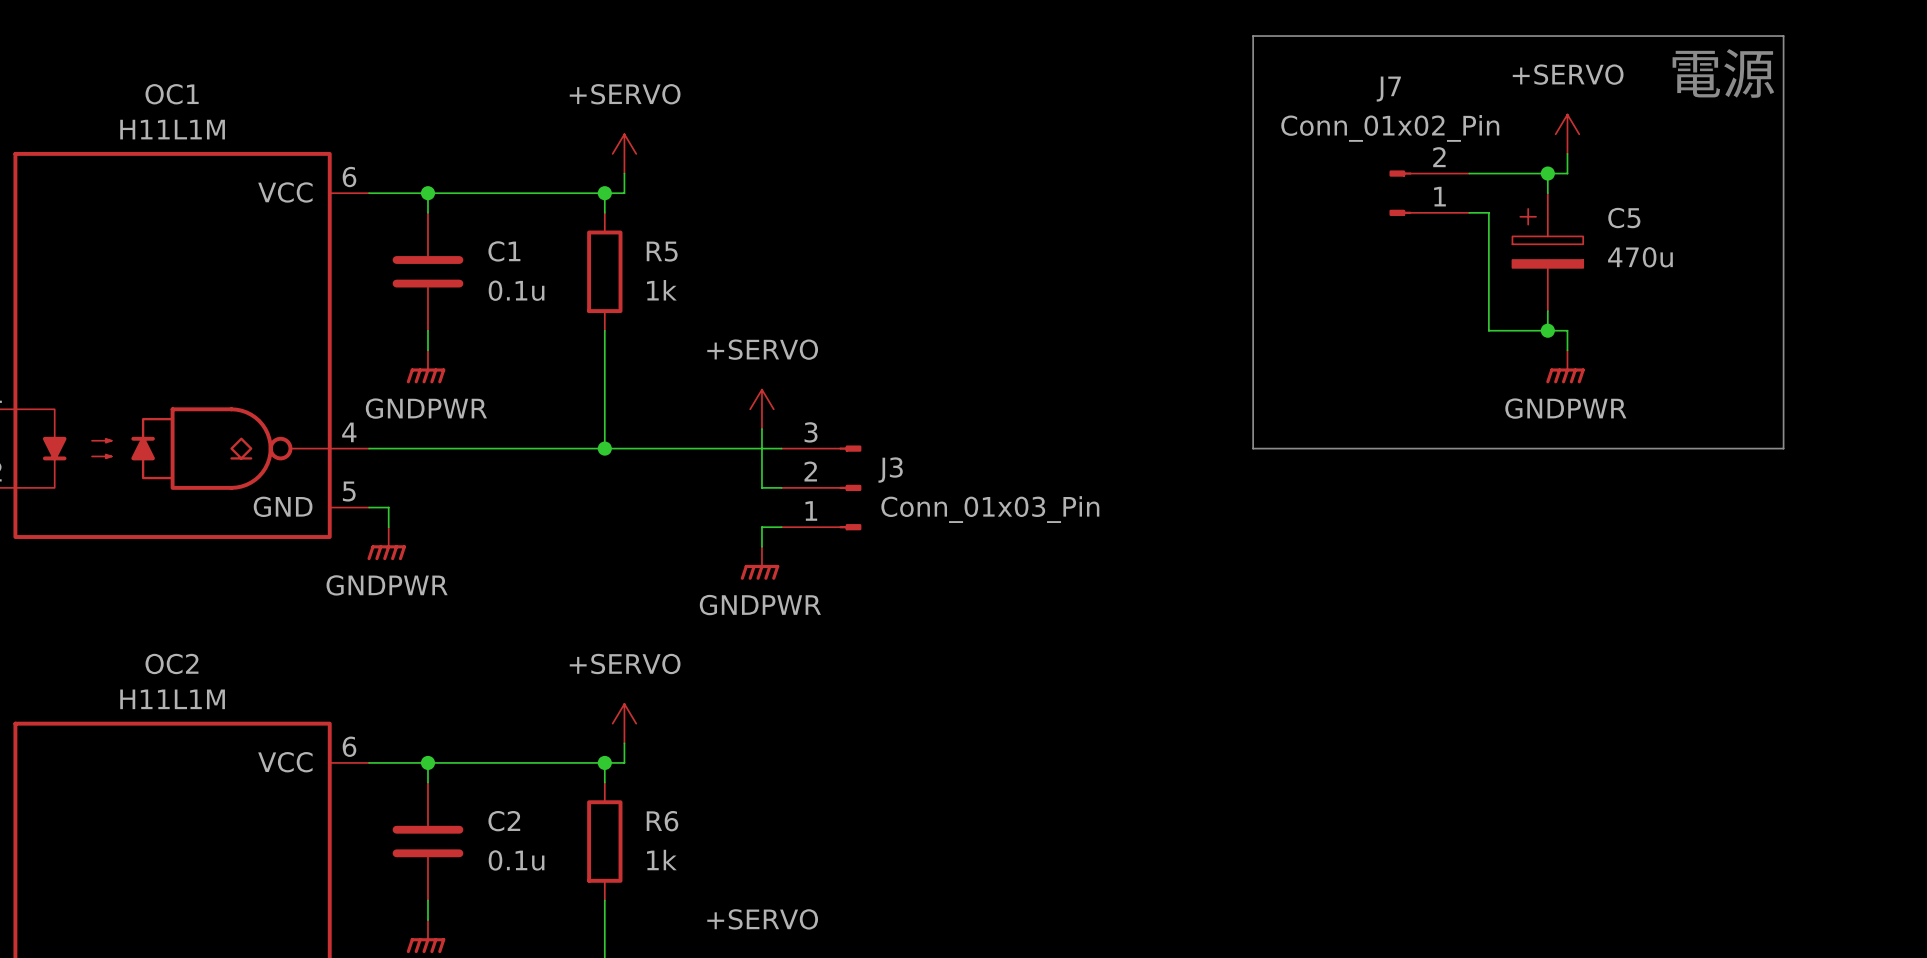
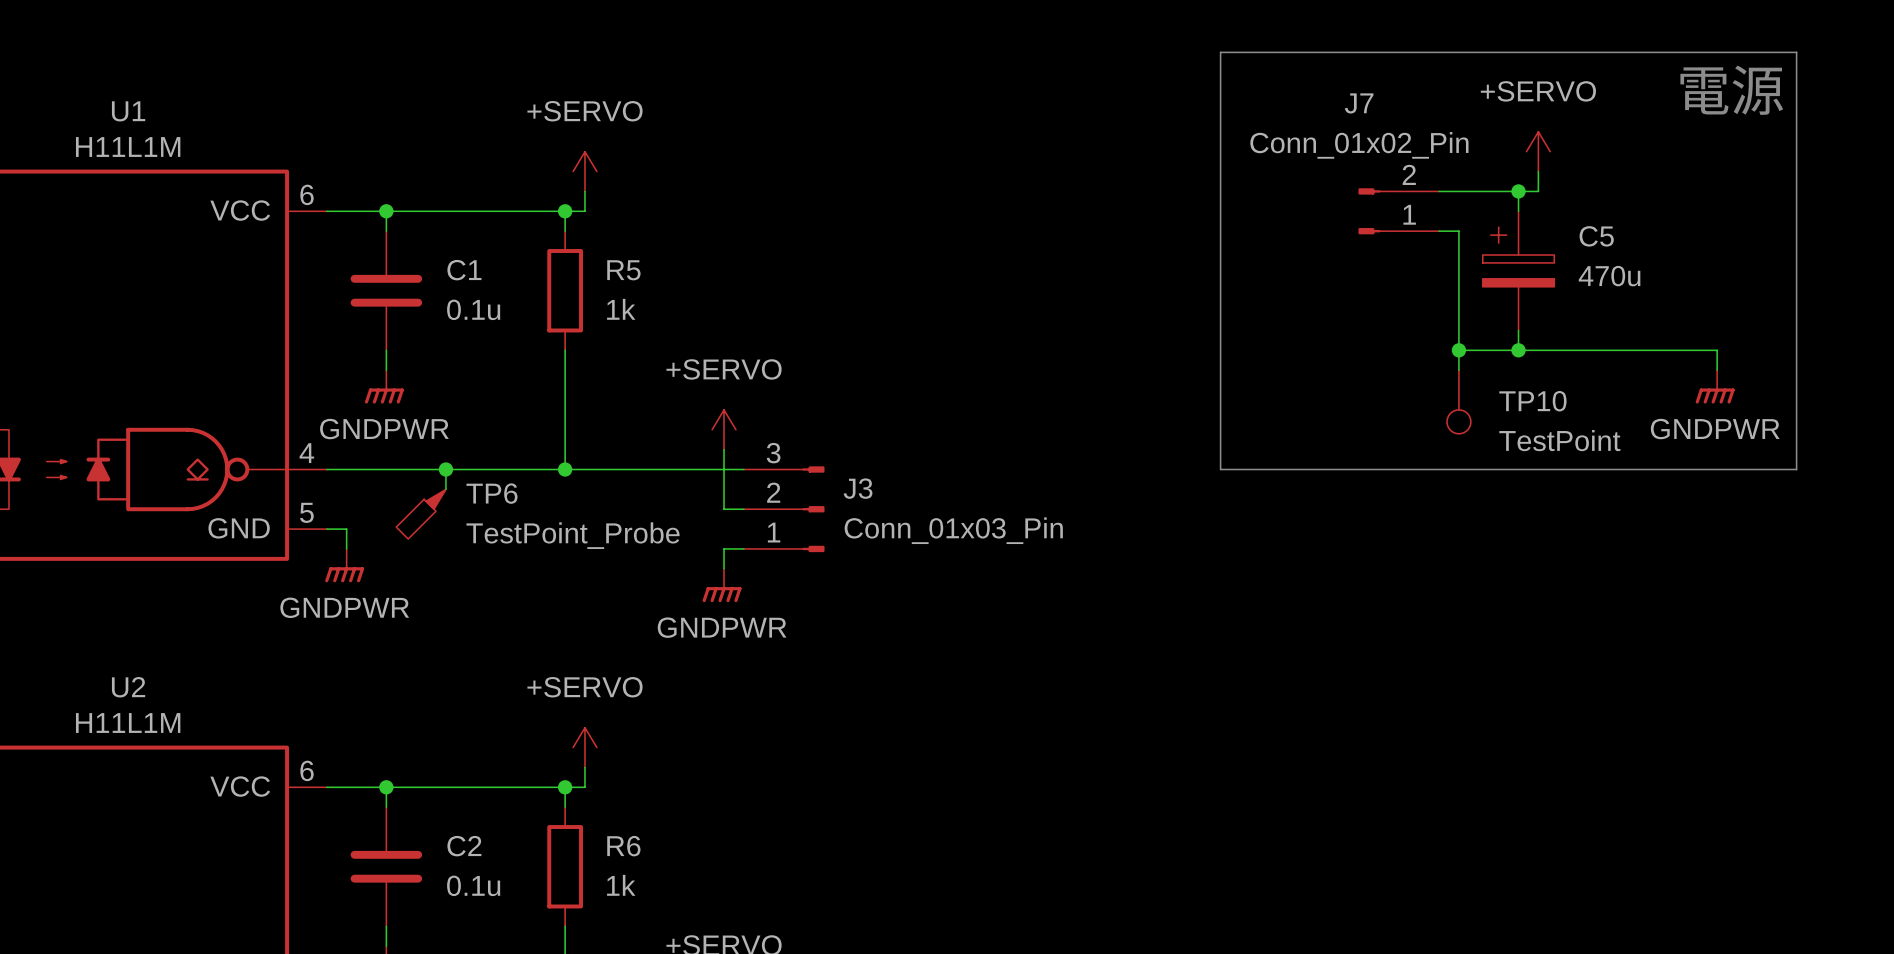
line: (1783, 36) (1783, 448) -> (1756, 52) (1796, 52) (1796, 469) (1756, 469)
text position: 電源 (1723, 73) -> 電源 (1731, 90)
OC1 name: OC1 (172, 94) -> U1 (128, 111)
wire: none -> (1458, 350) (1458, 370)
junction: none -> (1458, 350)
wire: (1567, 330) (1567, 350) -> (1538, 350) (1717, 350) (1717, 370)
power symbol position: GNDPWR (1565, 366) -> GNDPWR (1715, 386)
TP10: none -> TestPoint (1458, 401)
wire: none -> (445, 469) (445, 489)
junction: none -> (445, 469)
TP6: none -> TestPoint_Probe (421, 514)
OC2 name: OC2 (171, 663) -> U2 (128, 687)

